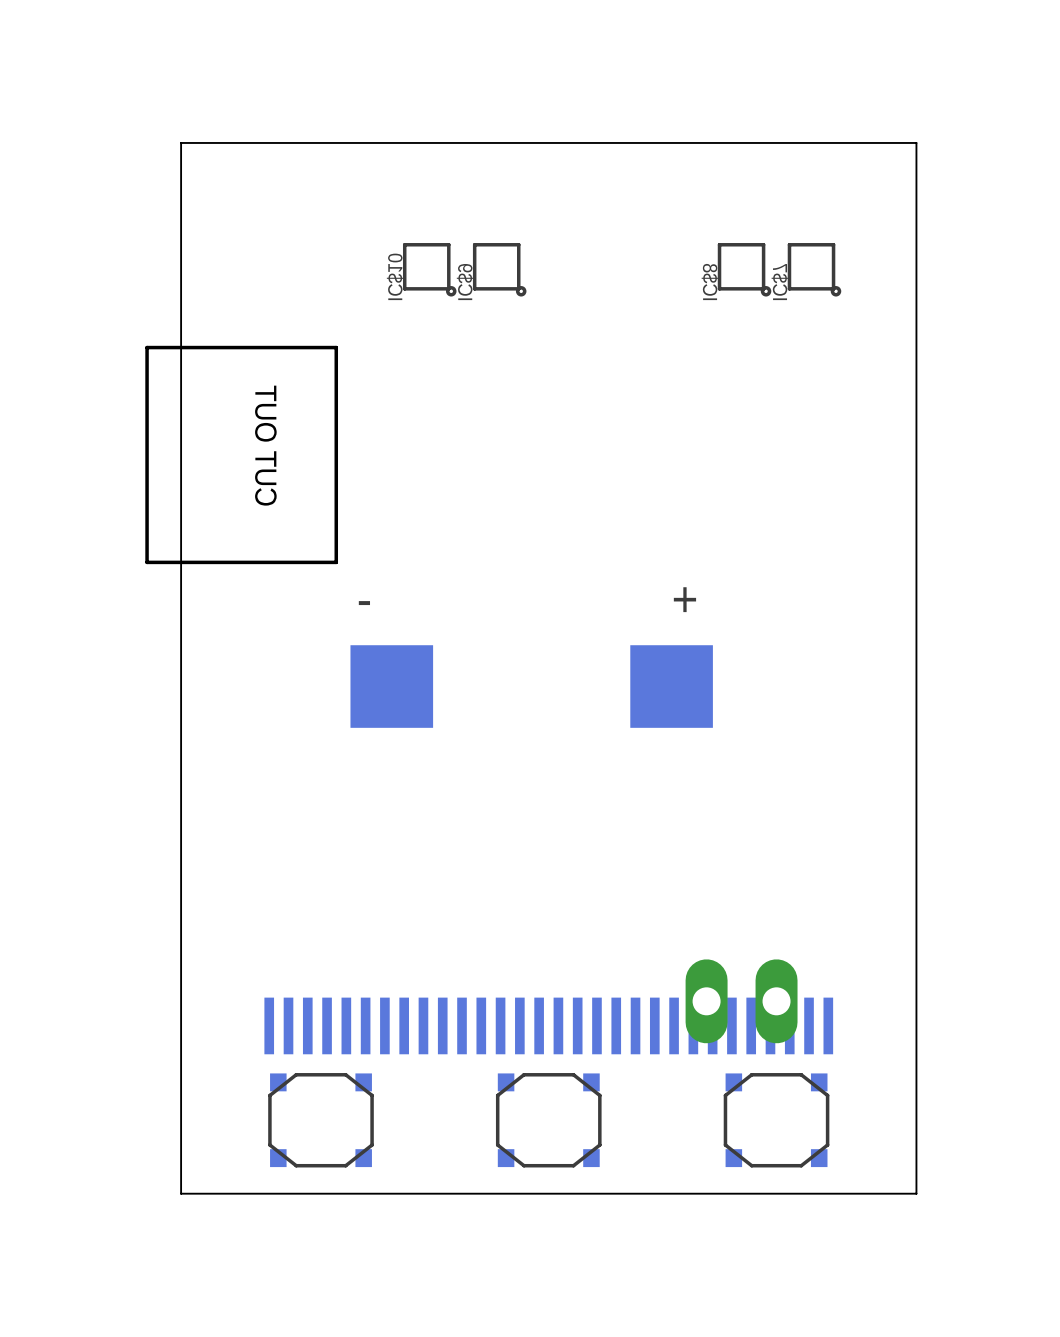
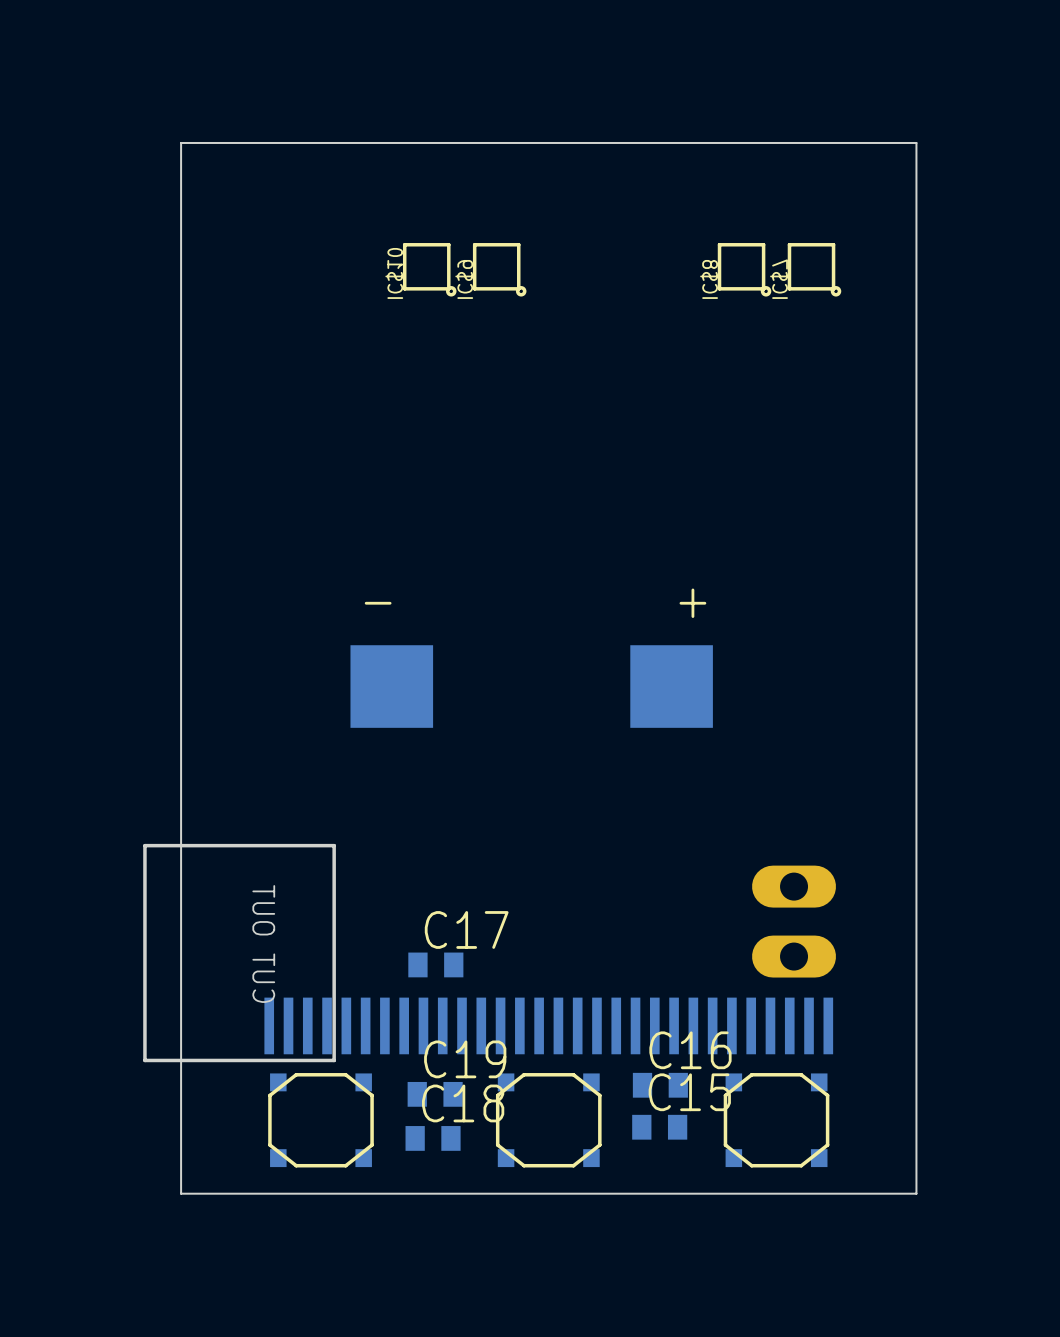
part position: (241, 454) -> (239, 953)
C17: none -> (435, 964)
part rotation: 0° (741, 1001) -> 90° clockwise (794, 921)
part position: (741, 1001) -> (794, 921)
C16: none -> (660, 1085)
C19: none -> (435, 1094)
C15: none -> (659, 1127)
C18: none -> (433, 1138)

